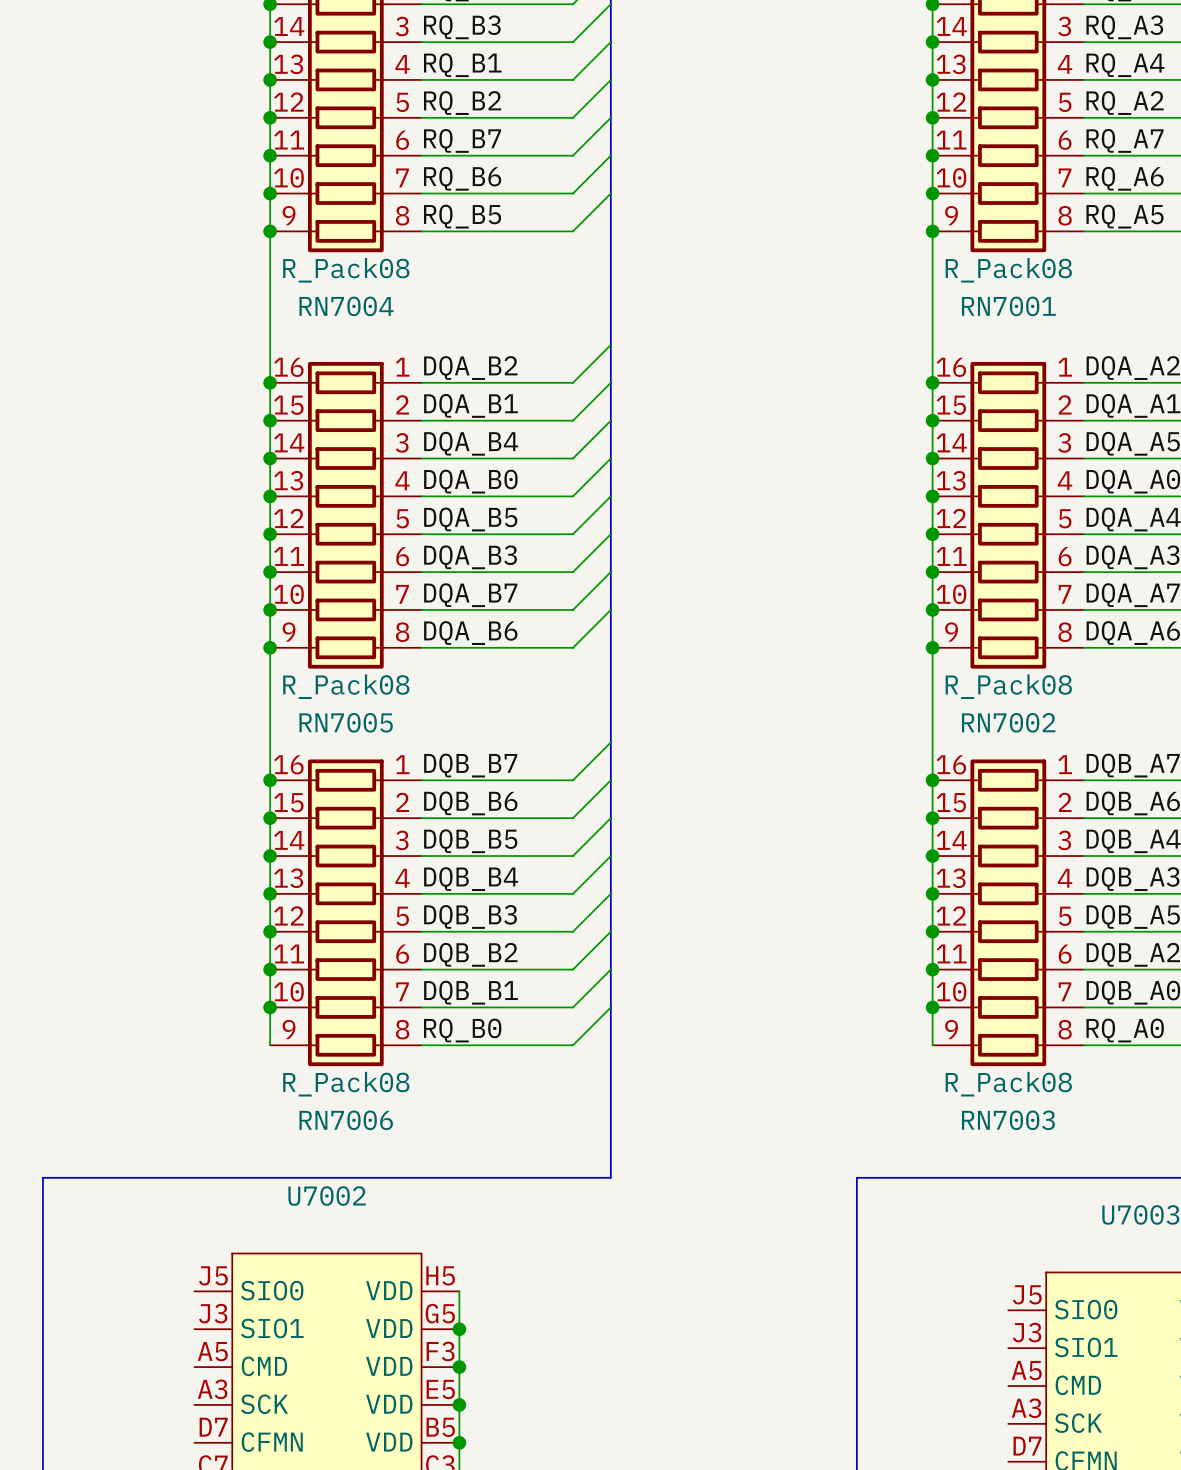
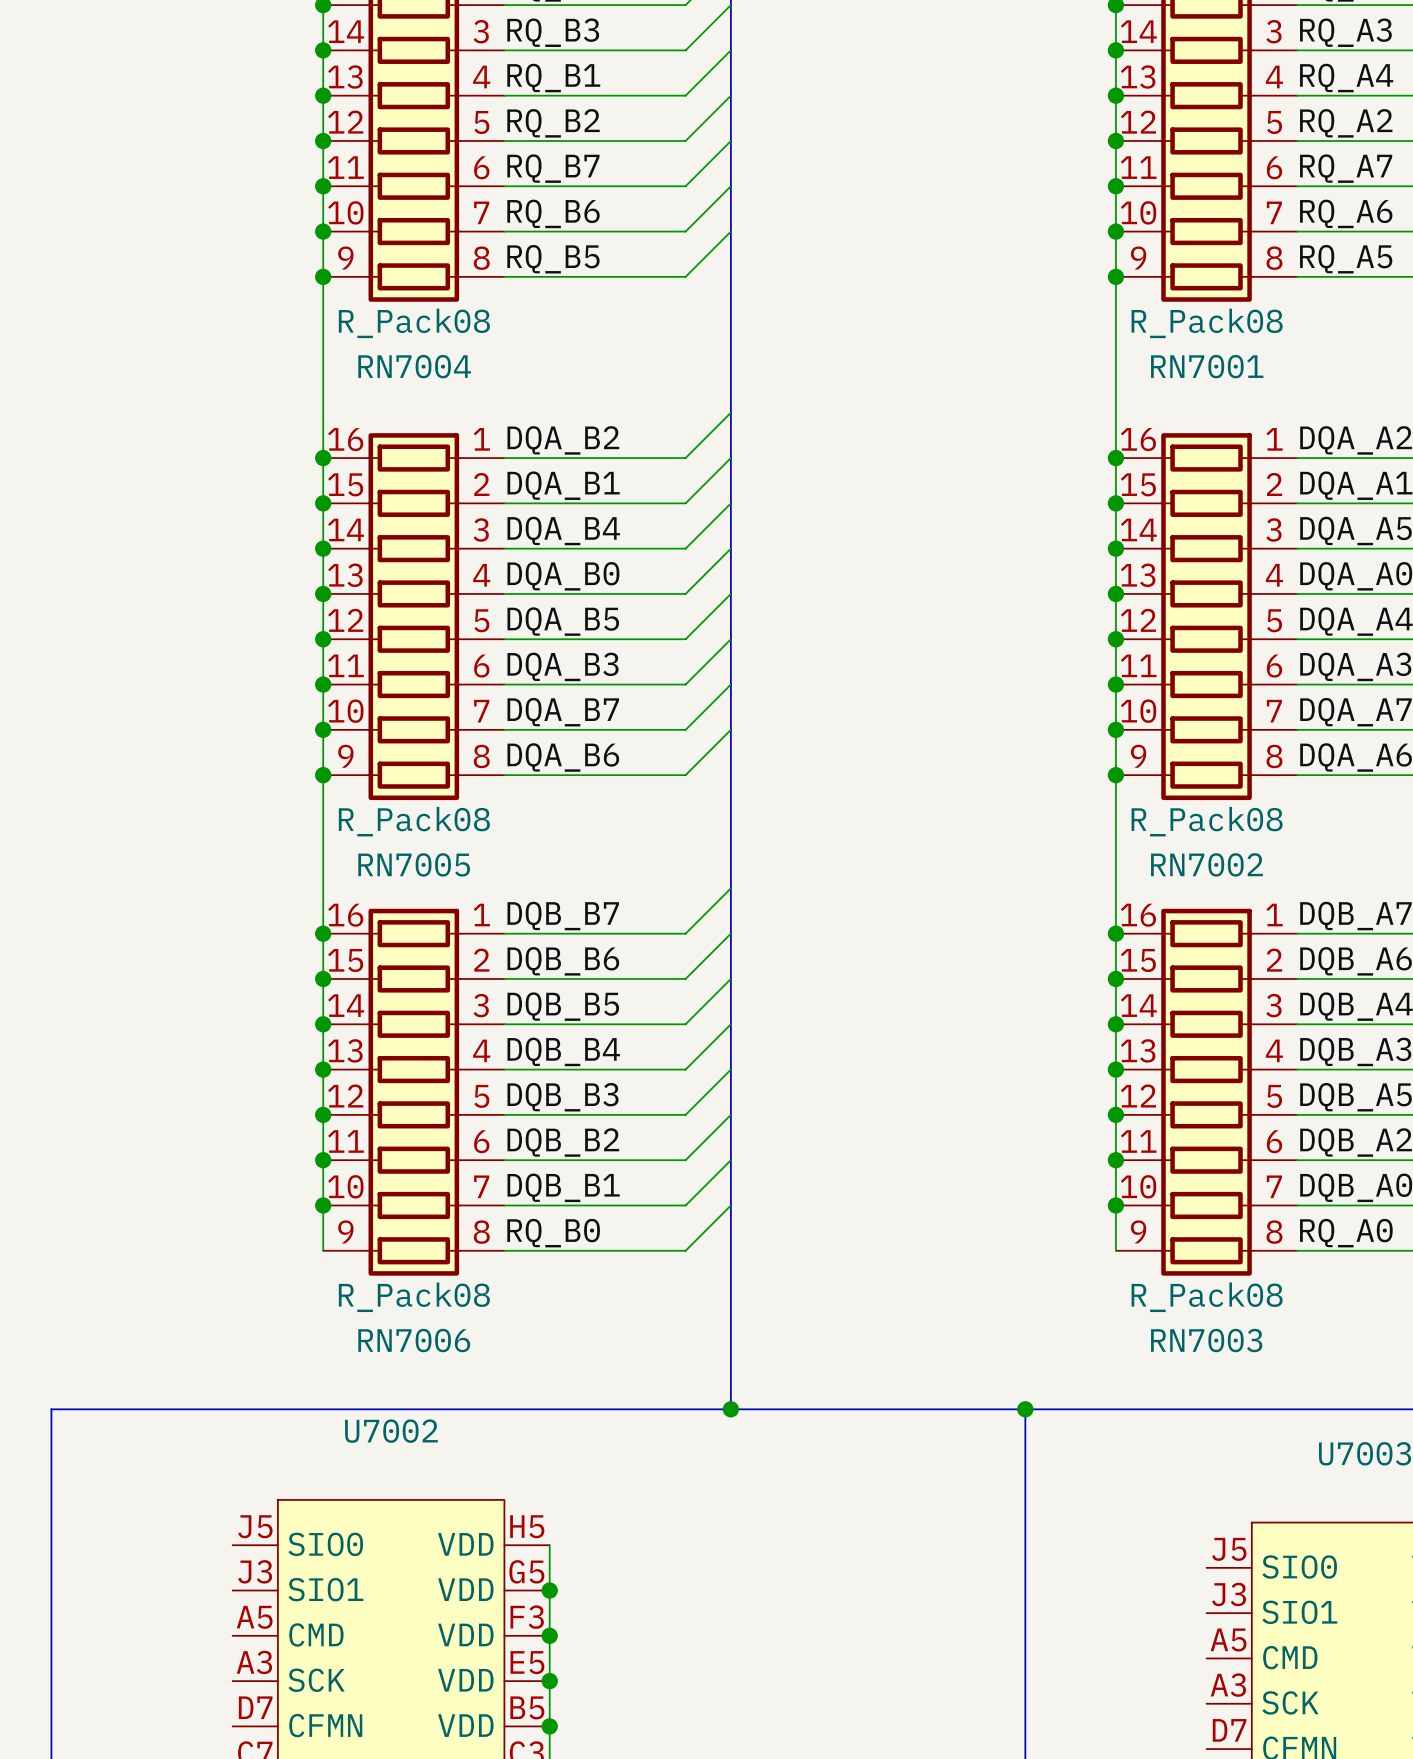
bus: none -> (730, 1409) (1025, 1409)
junction: none -> (730, 1409)
junction: none -> (1025, 1409)

